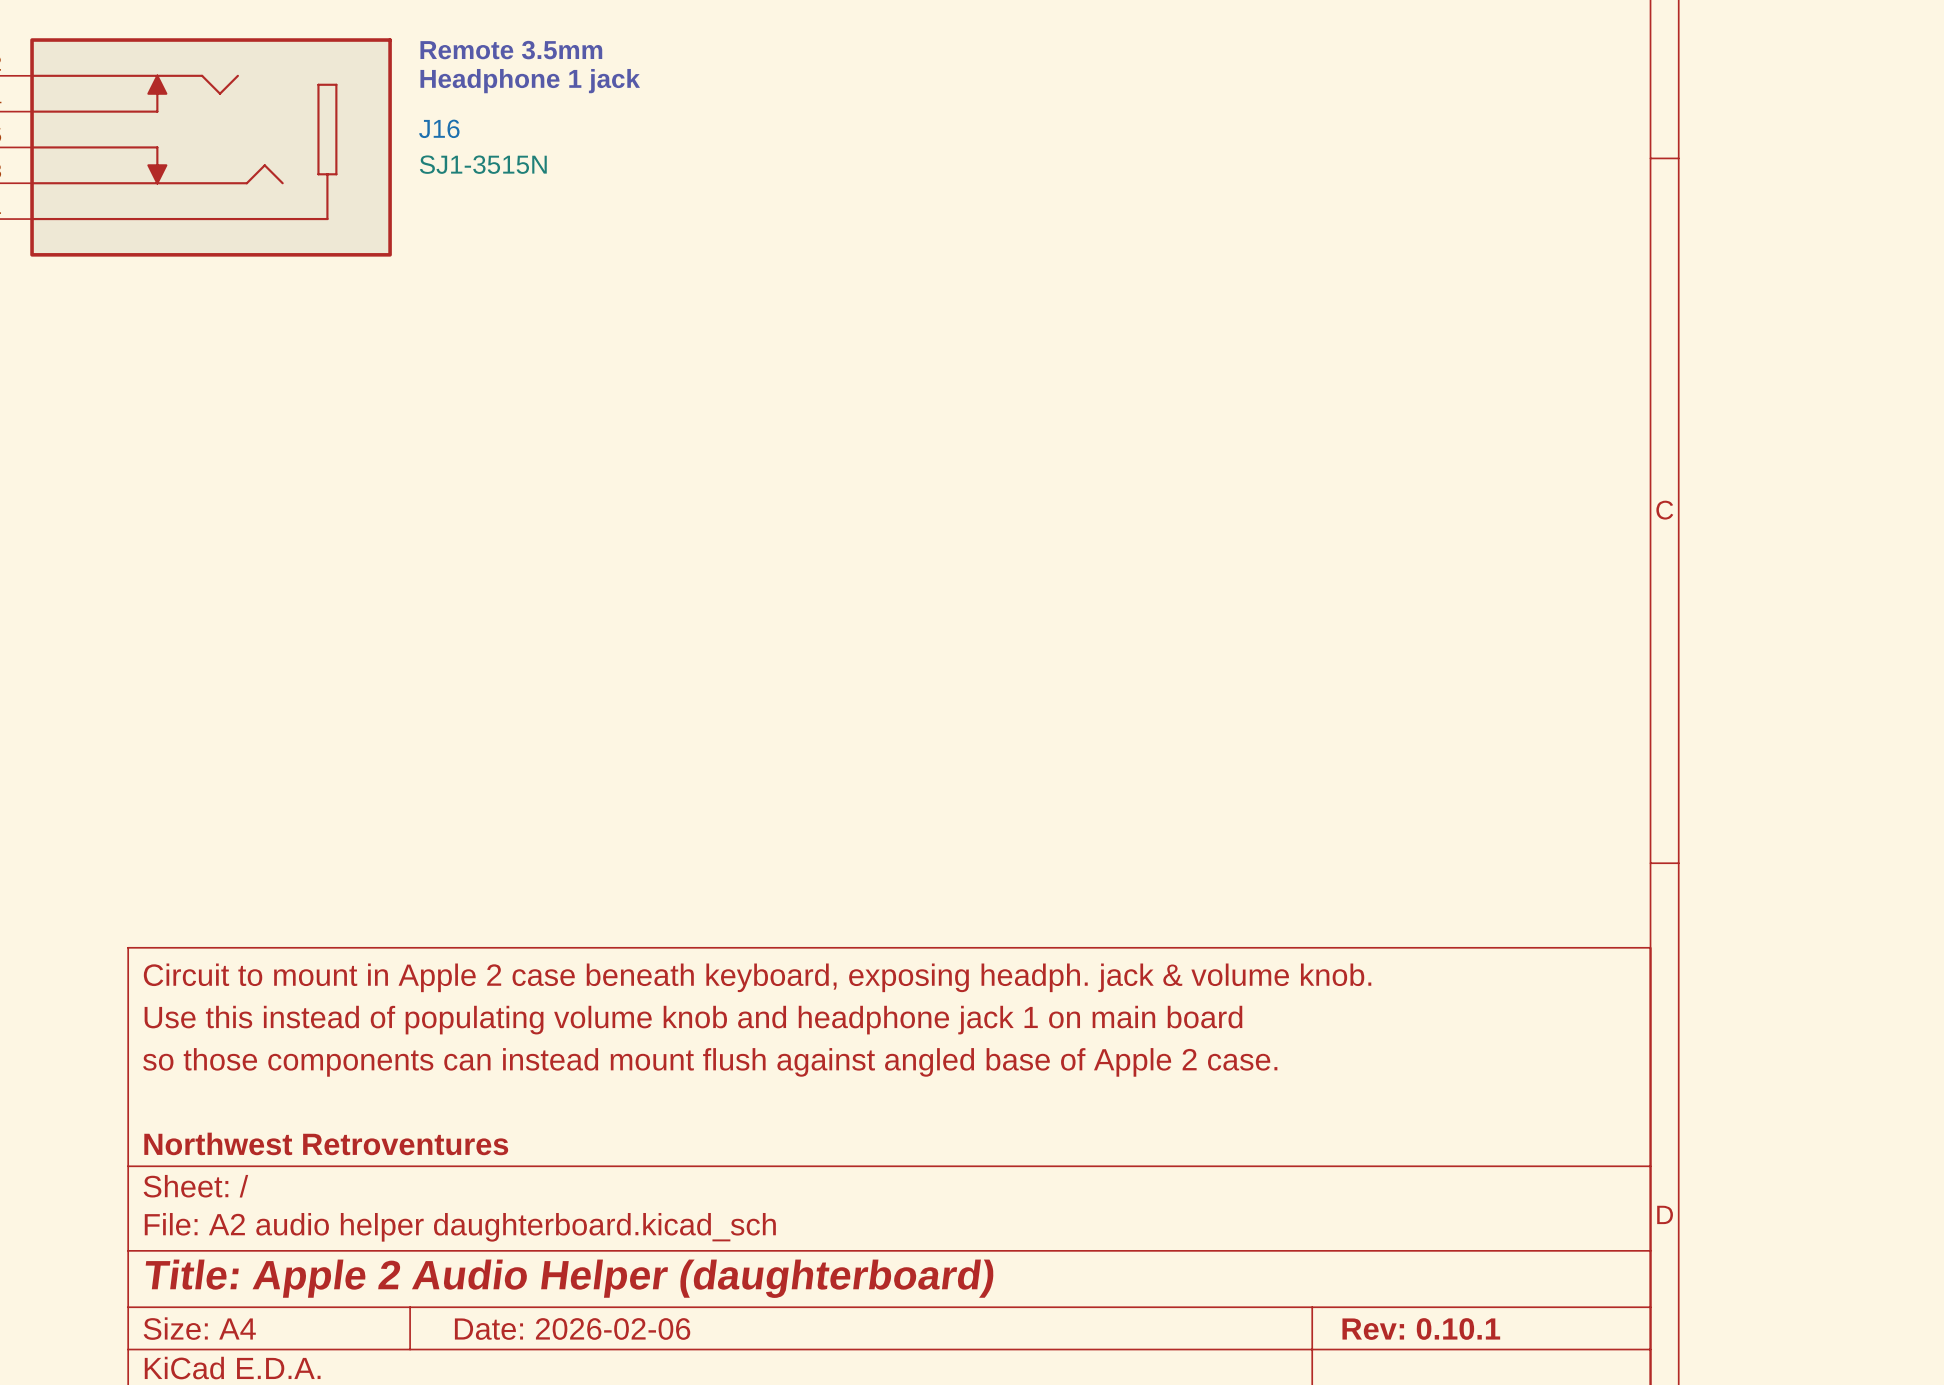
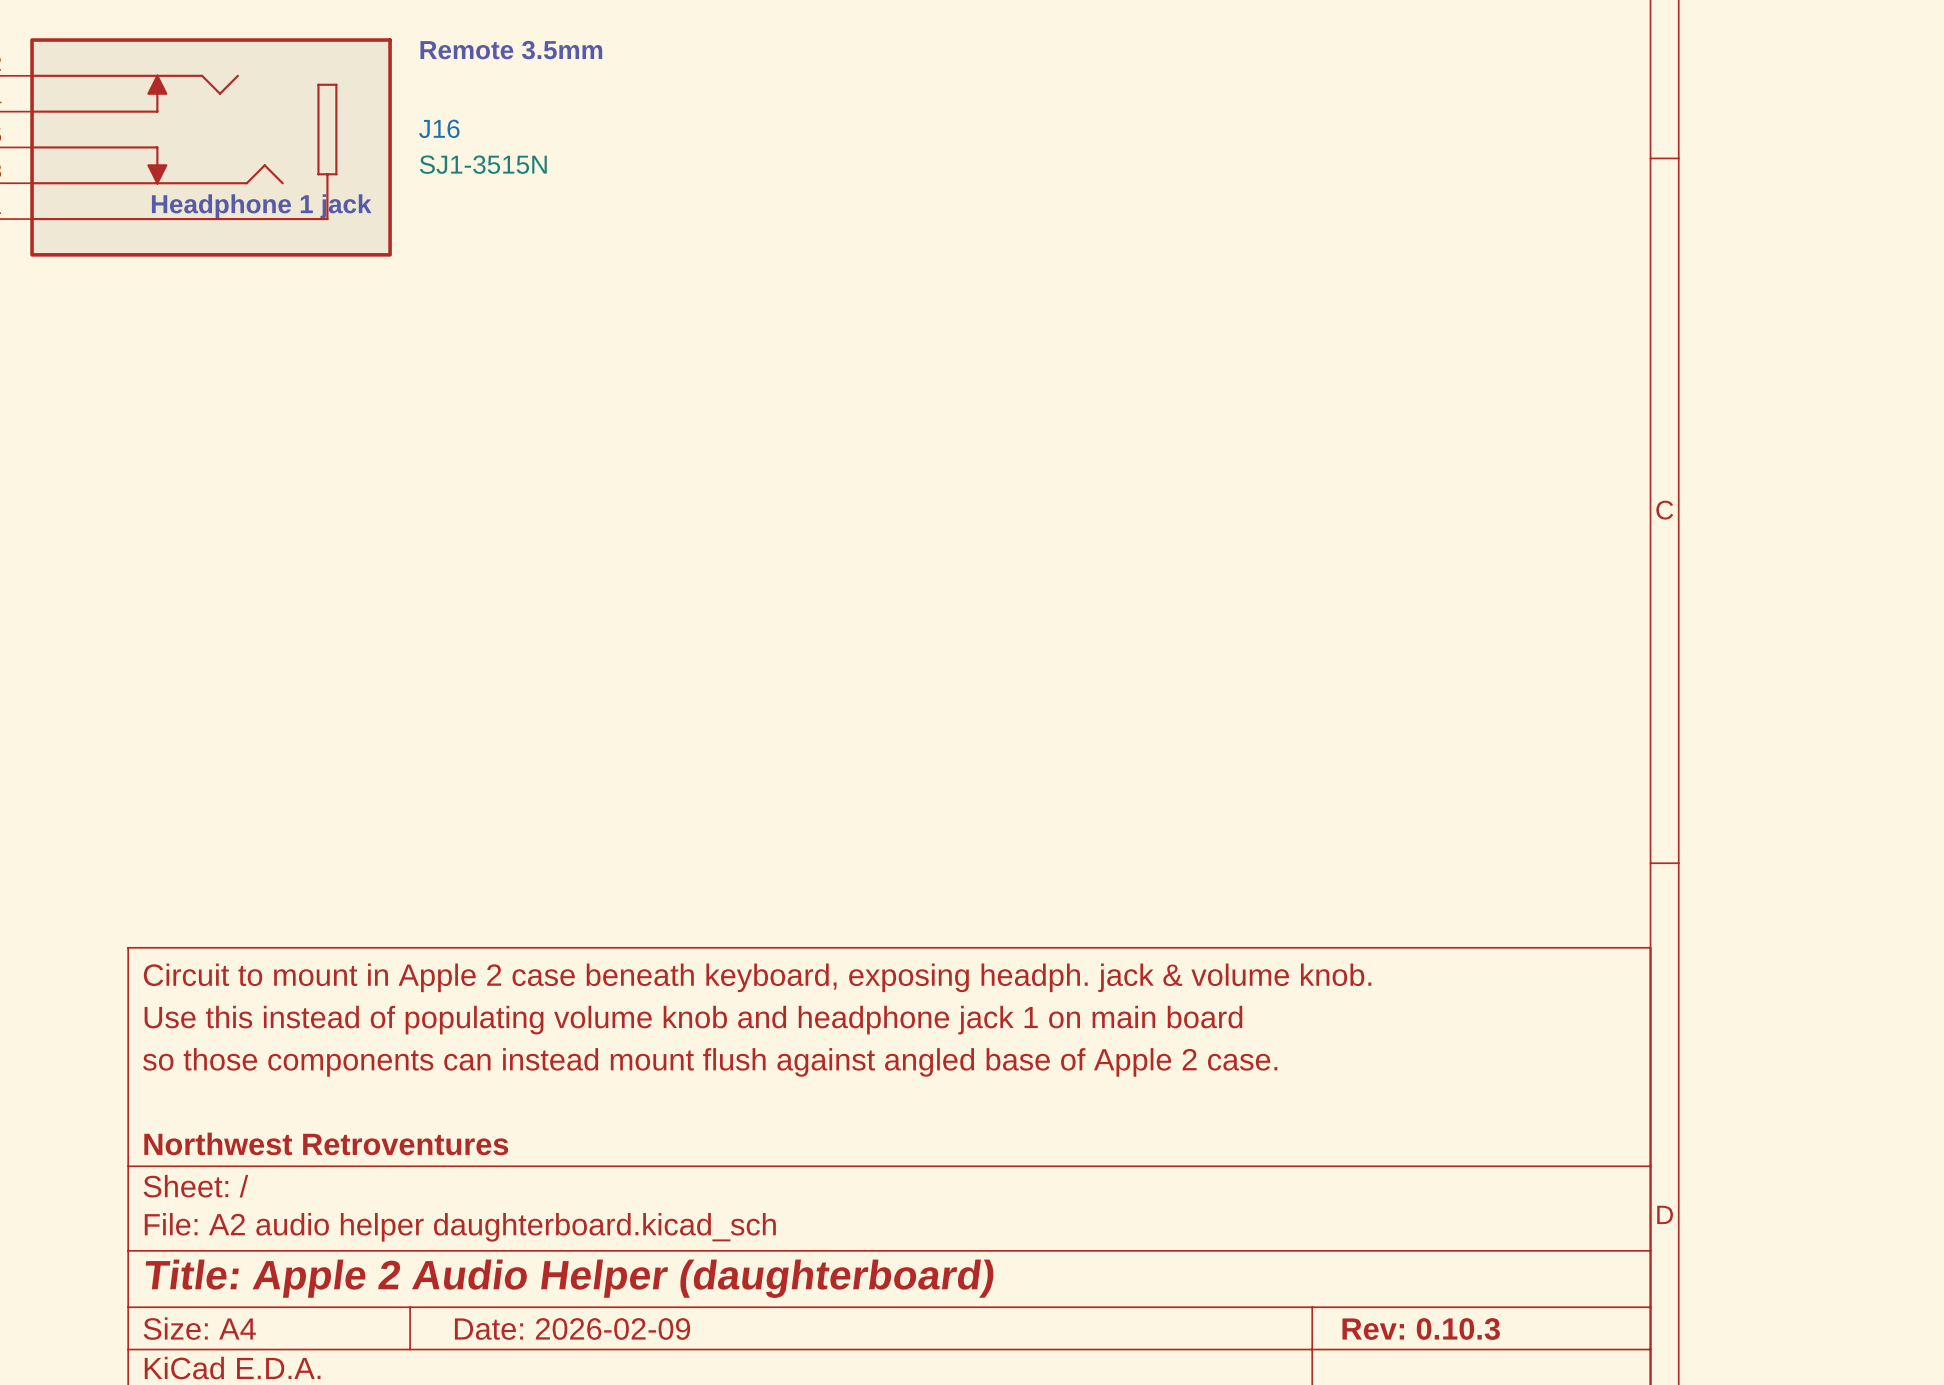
text position: Headphone 1 jack (530, 81) -> Headphone 1 jack (261, 206)
title block: Date: 2026-02-06 (572, 1328) -> Date: 2026-02-09 (572, 1328)
title block: Rev: 0.10.1 (1421, 1328) -> Rev: 0.10.3 (1421, 1329)

